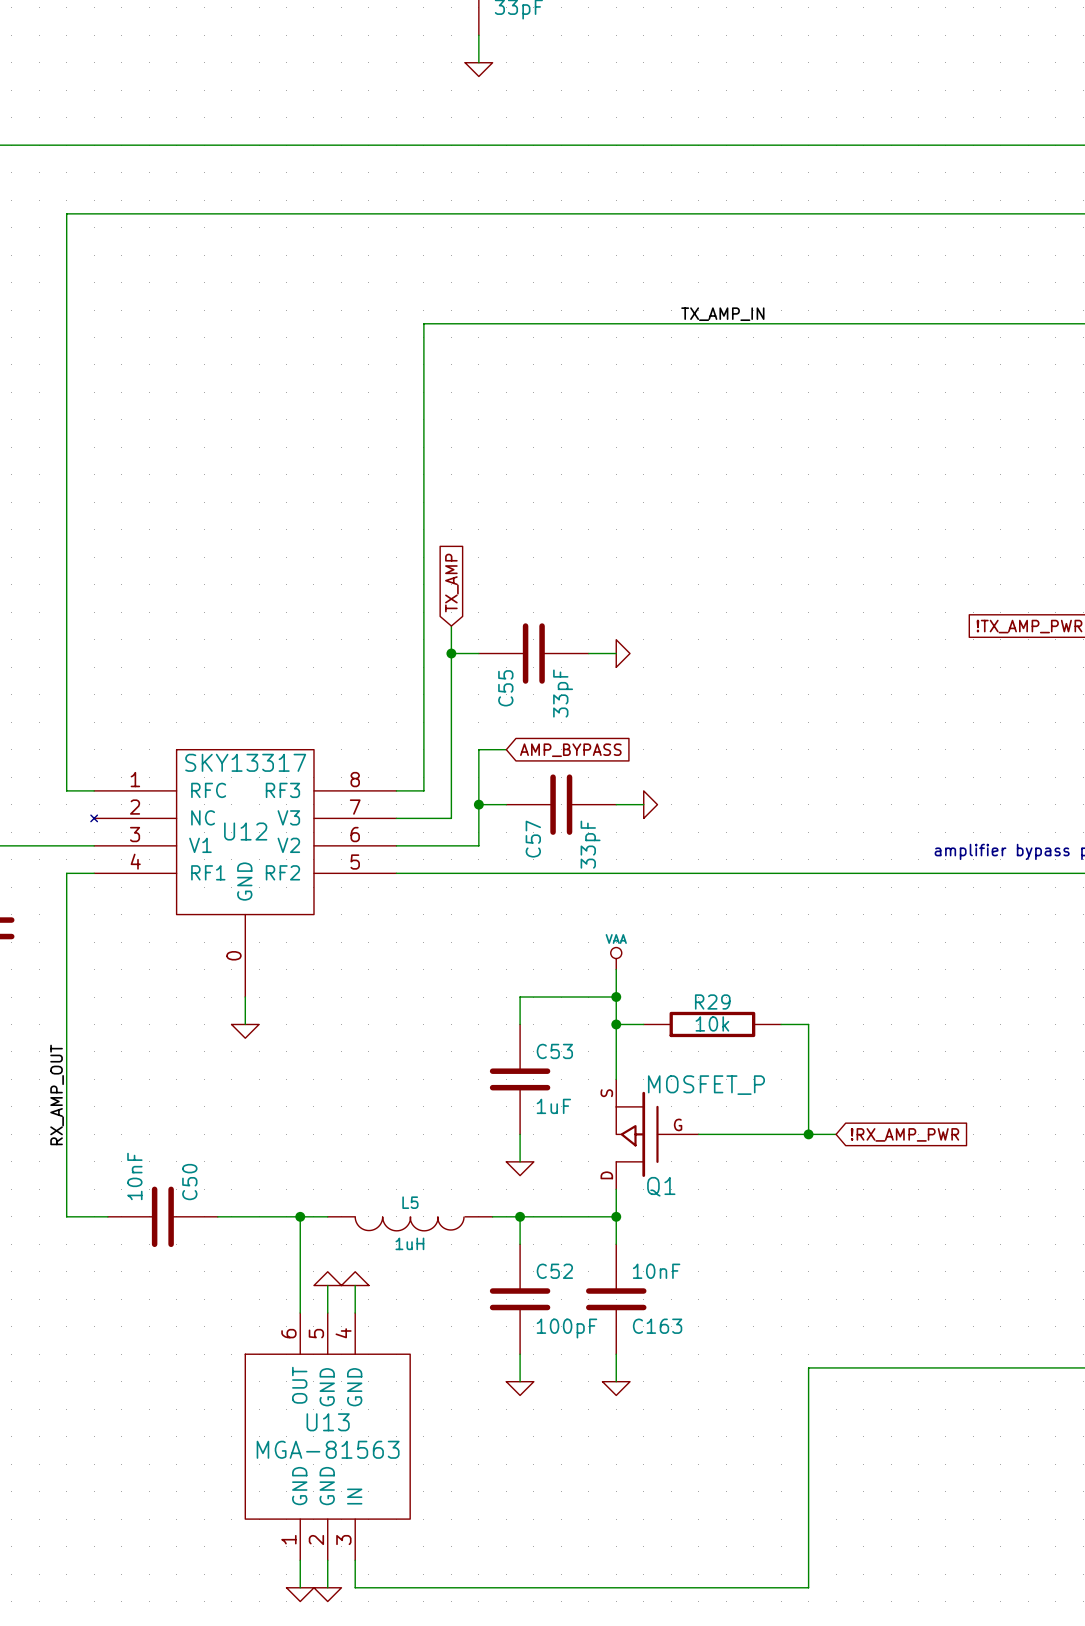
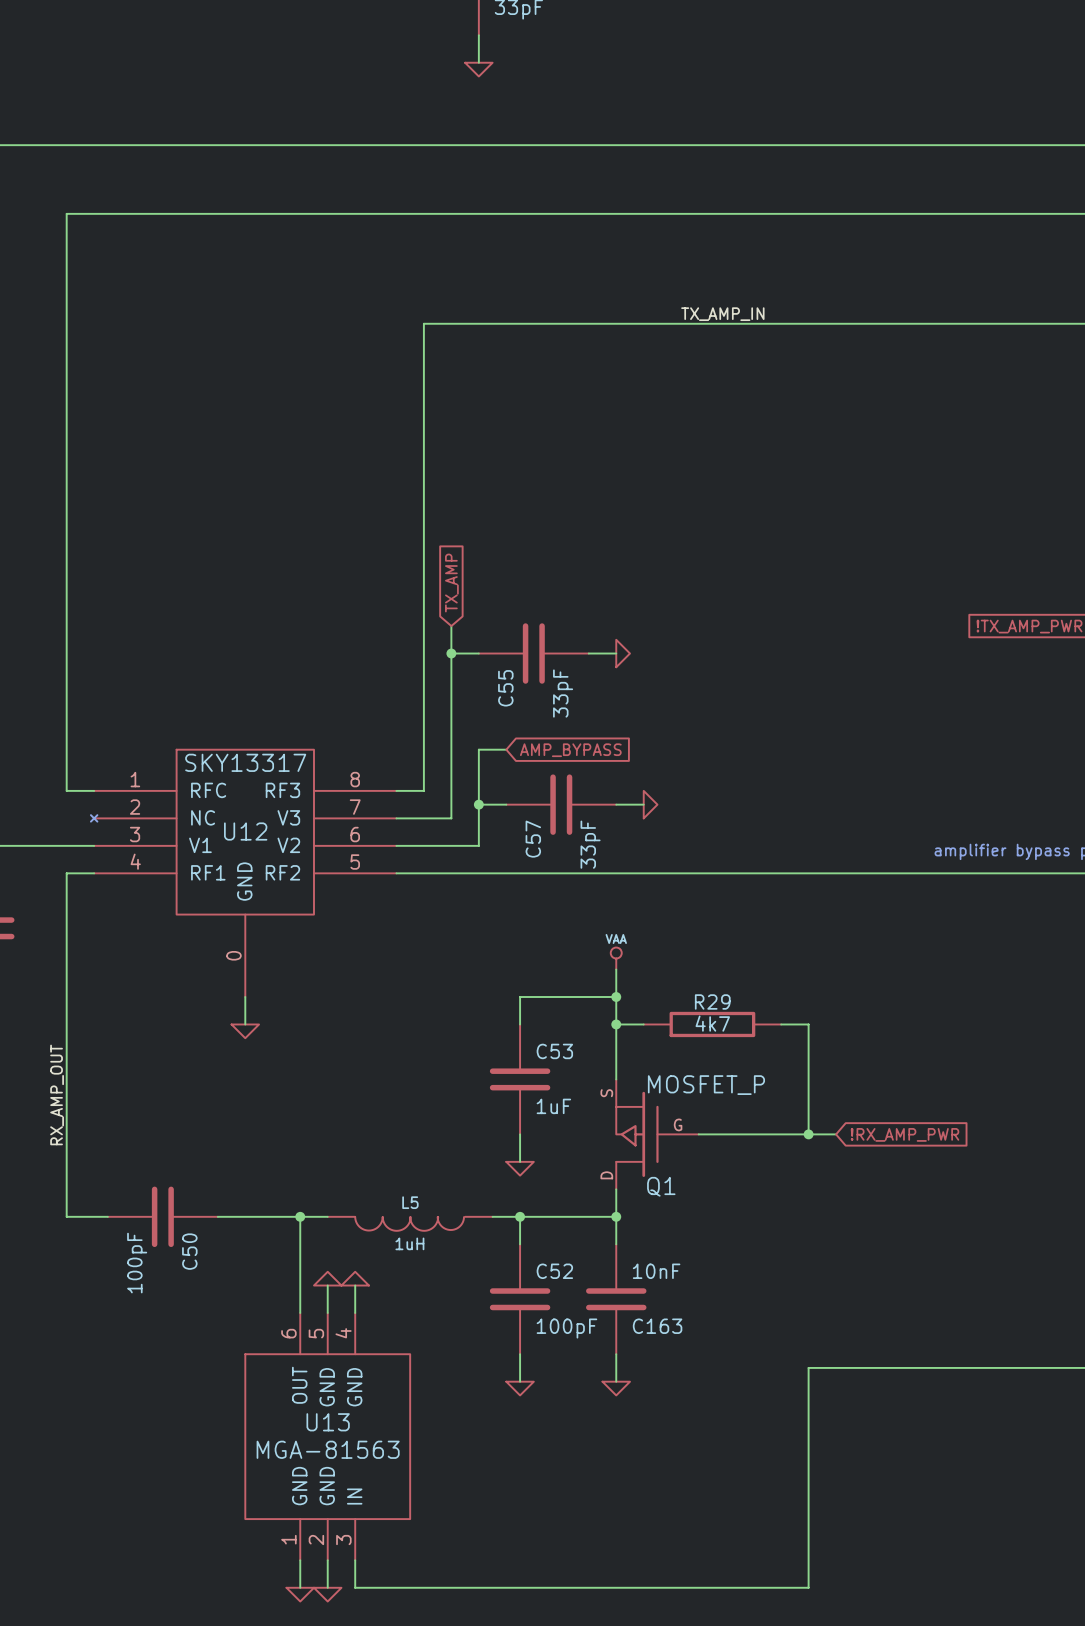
R29 value: 10k (712, 1023) -> 4k7 (712, 1023)
C50 value: 10nF (134, 1176) -> 100pF (137, 1263)
C50 name position: C50 (189, 1182) -> C50 (189, 1251)

